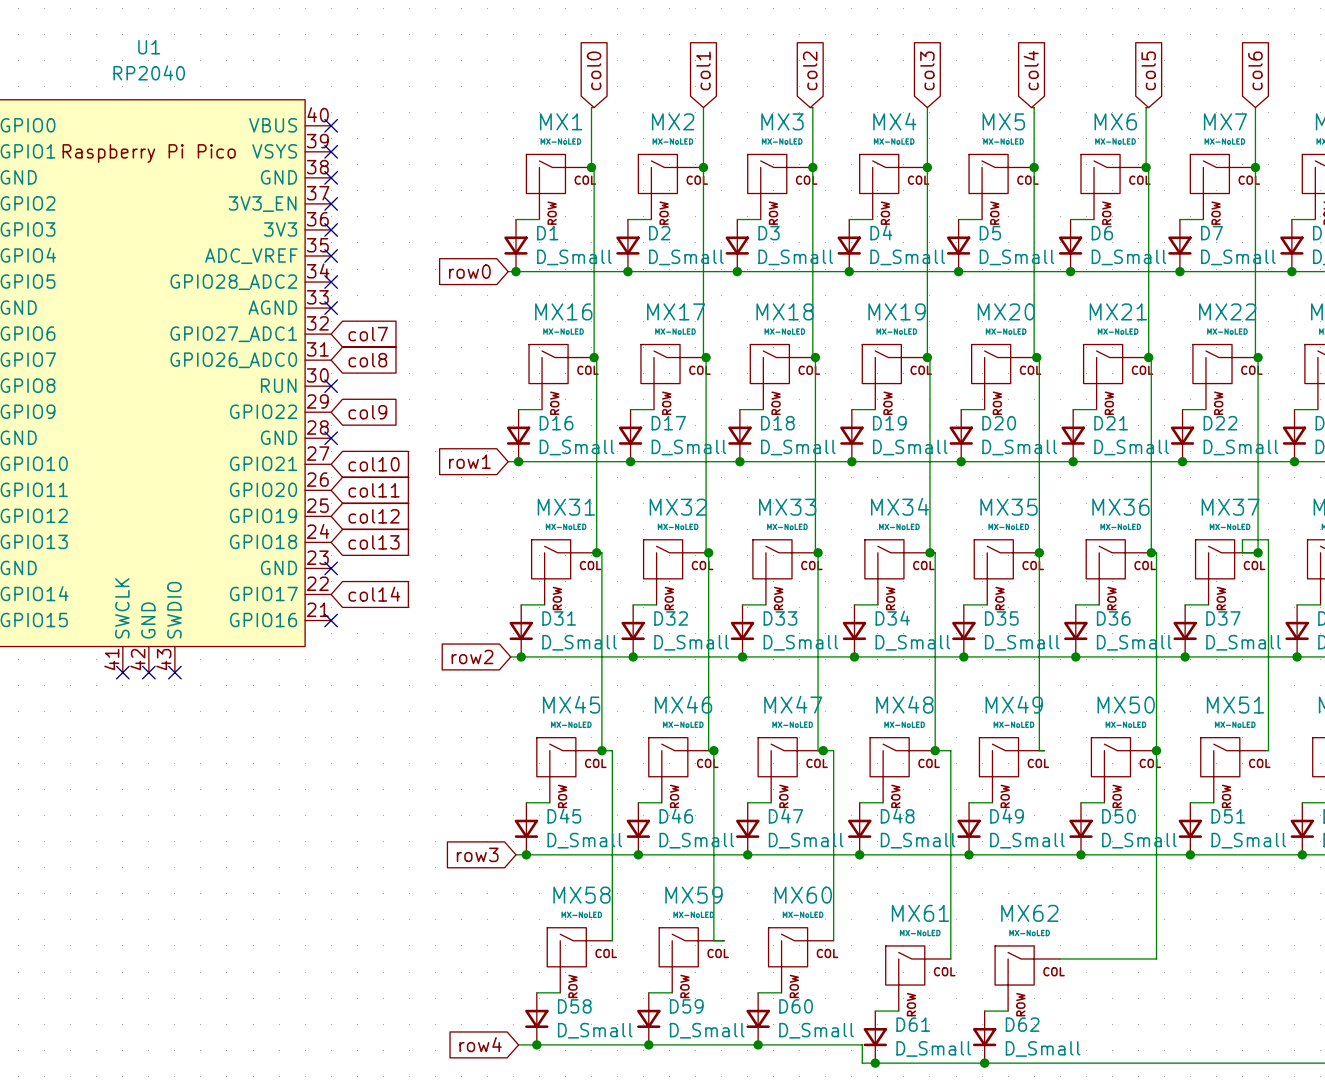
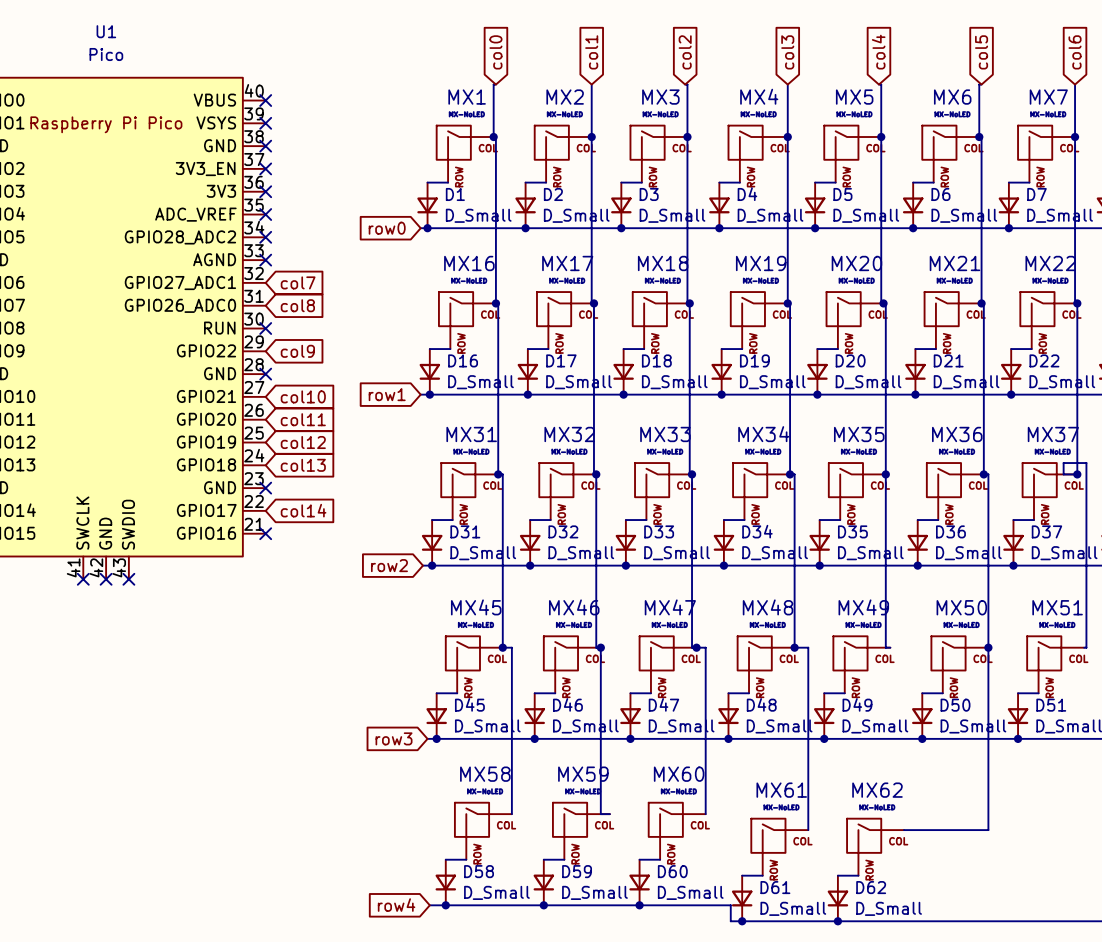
U1 value: RP2040 (149, 72) -> Pico (106, 54)

